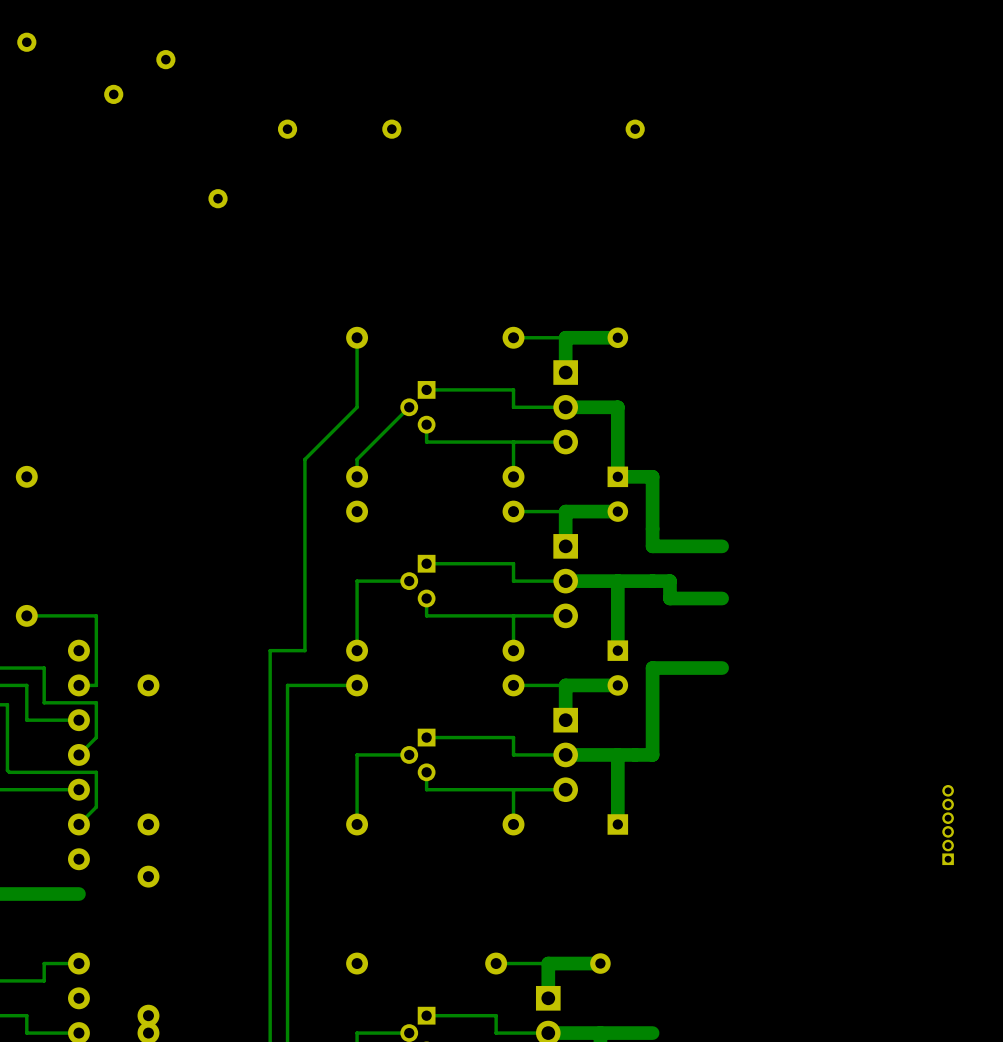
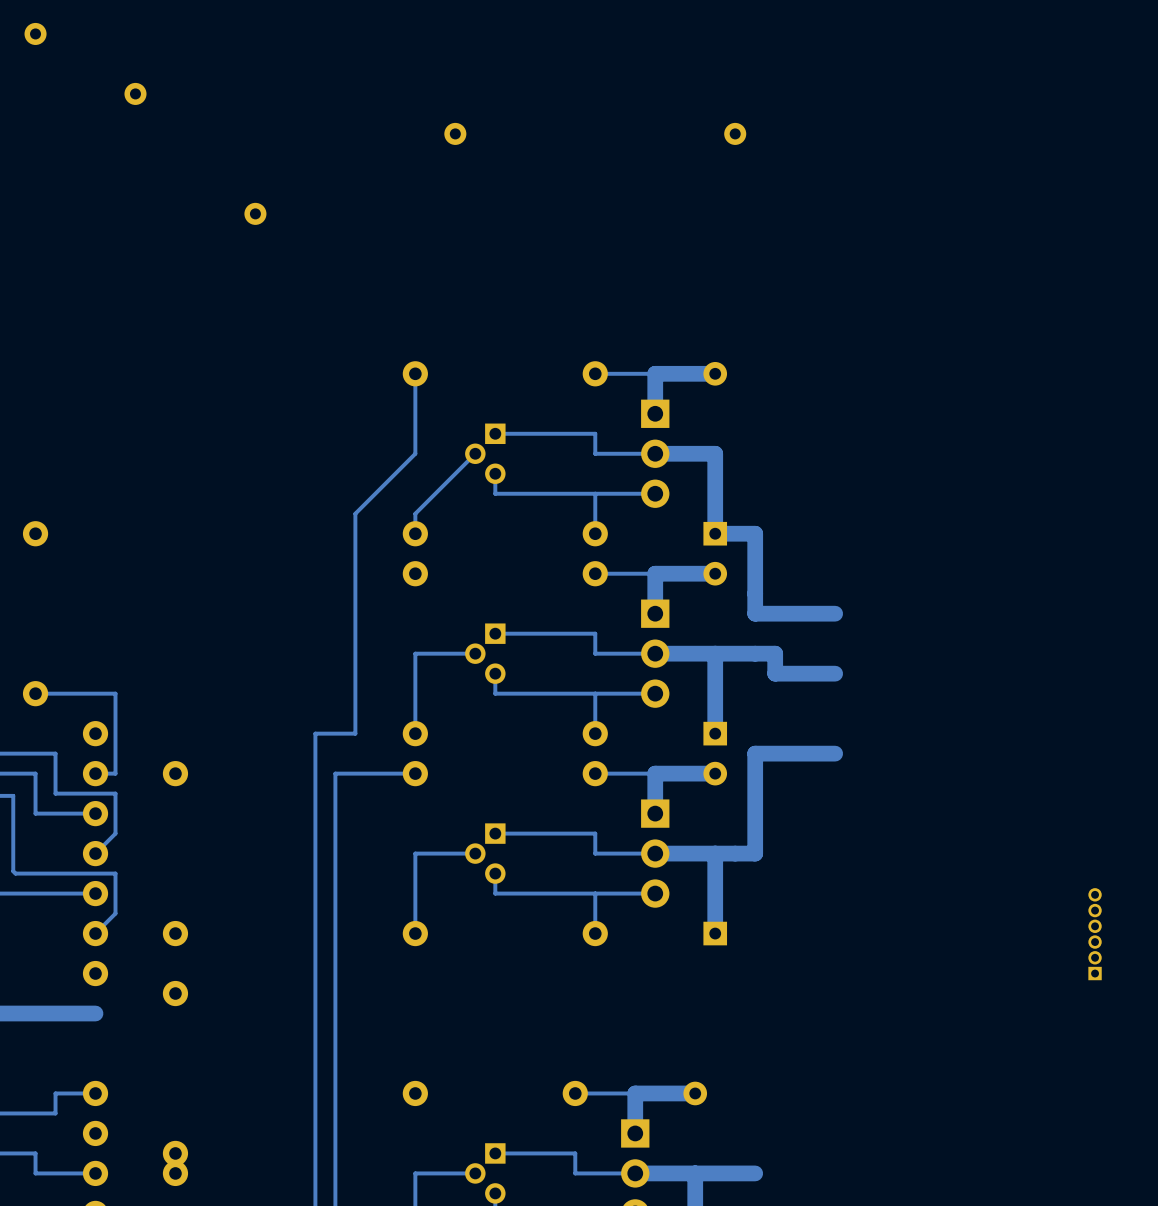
part: (165, 59) -> none
part: (287, 129) -> none

